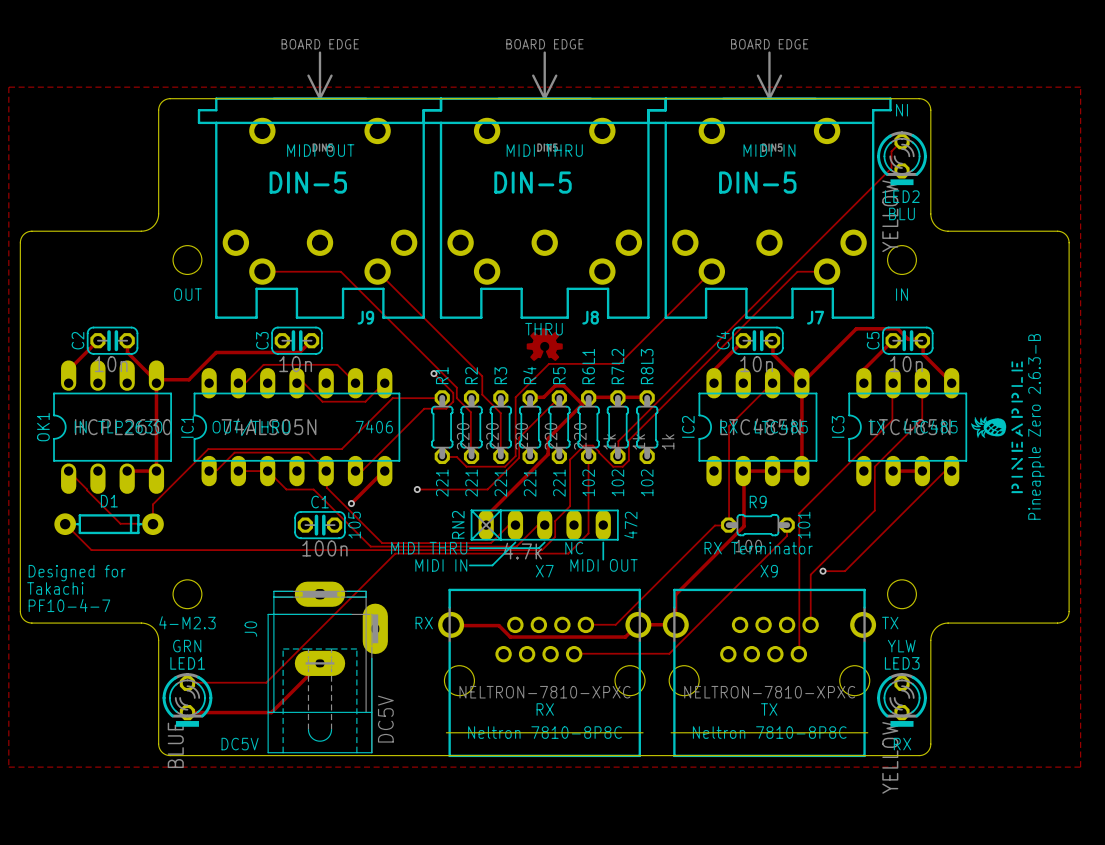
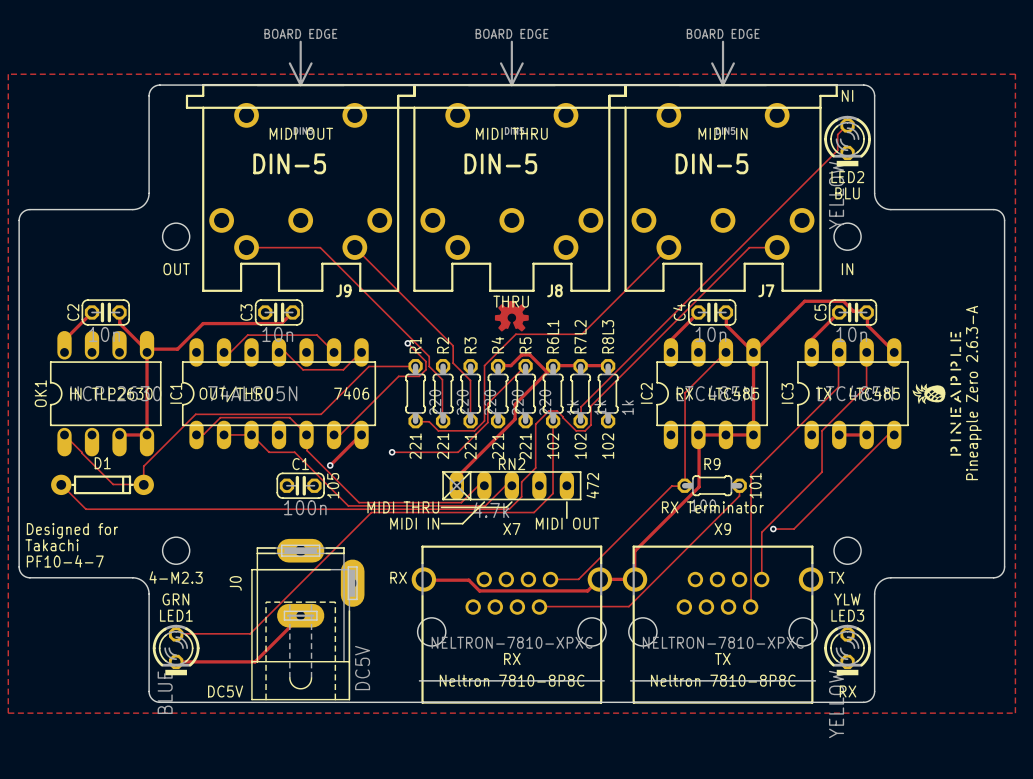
text: Pineapple Zero 2.6.3-B (1036, 426) -> Pineapple Zero 2.6.3-A (973, 392)
RN2 name rotation: 0° (458, 524) -> 90° clockwise (512, 464)
RN2 name position: RN2 (458, 524) -> RN2 (512, 464)
text: NC (574, 548) -> none

